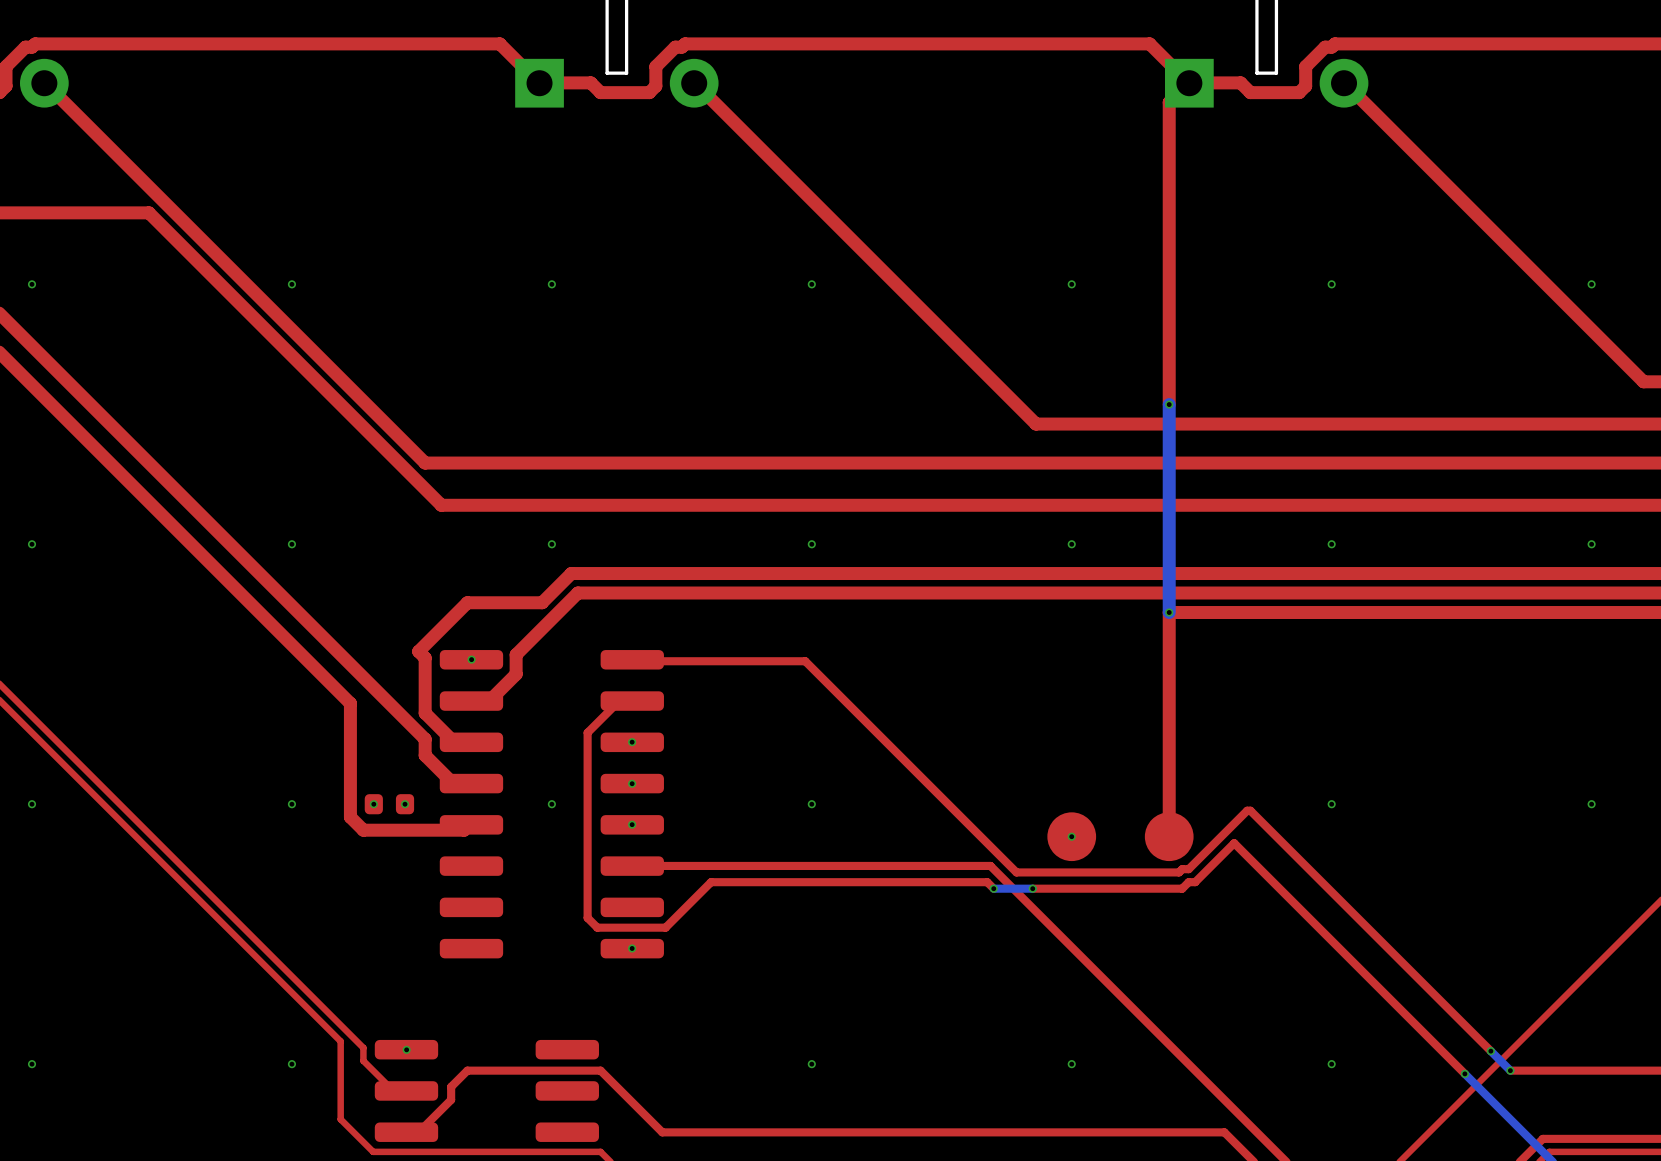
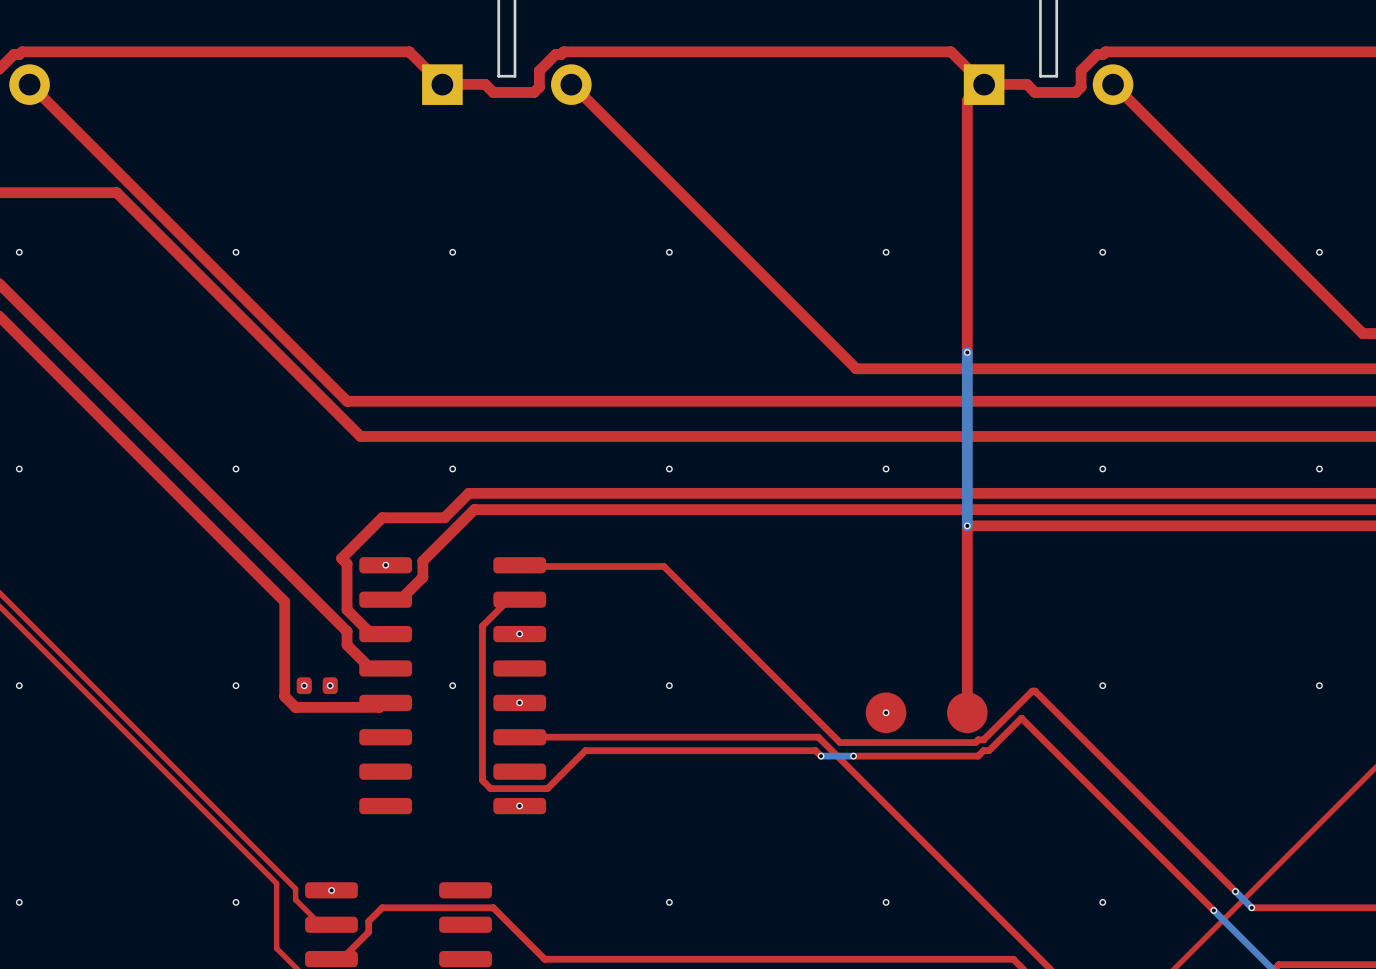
via: (632, 783) -> none

